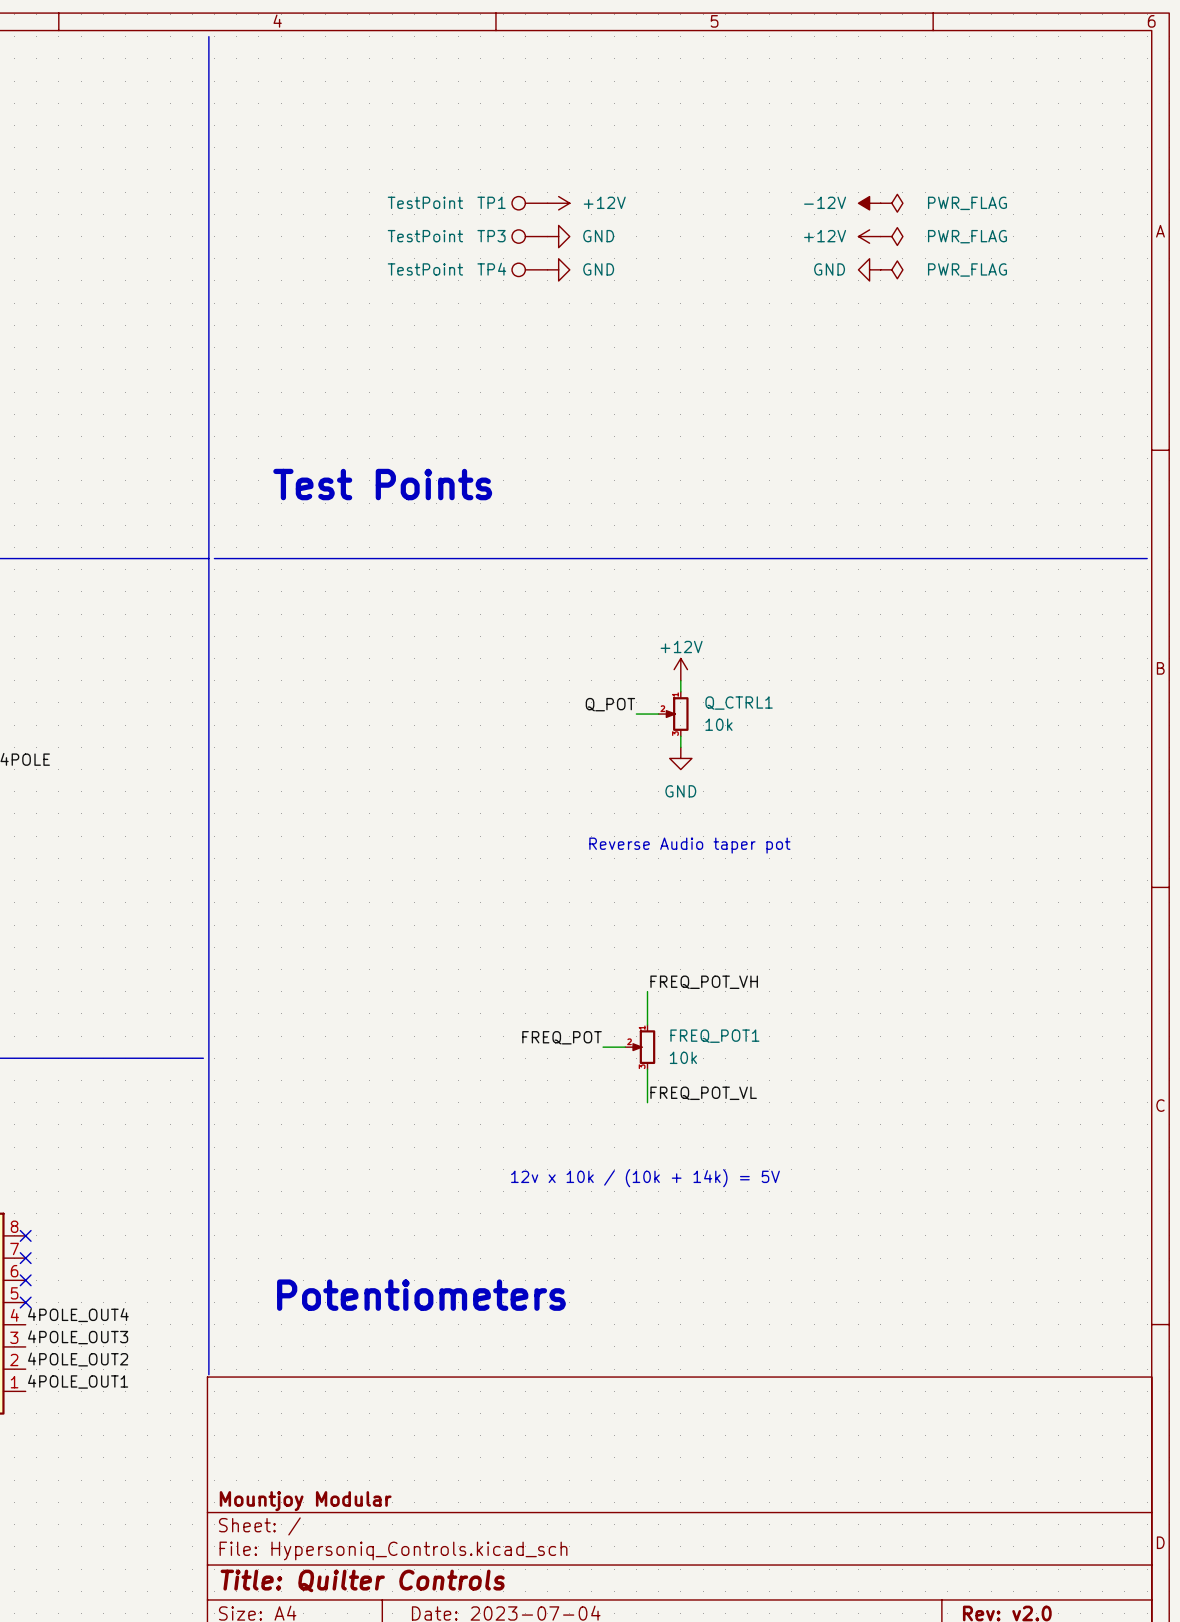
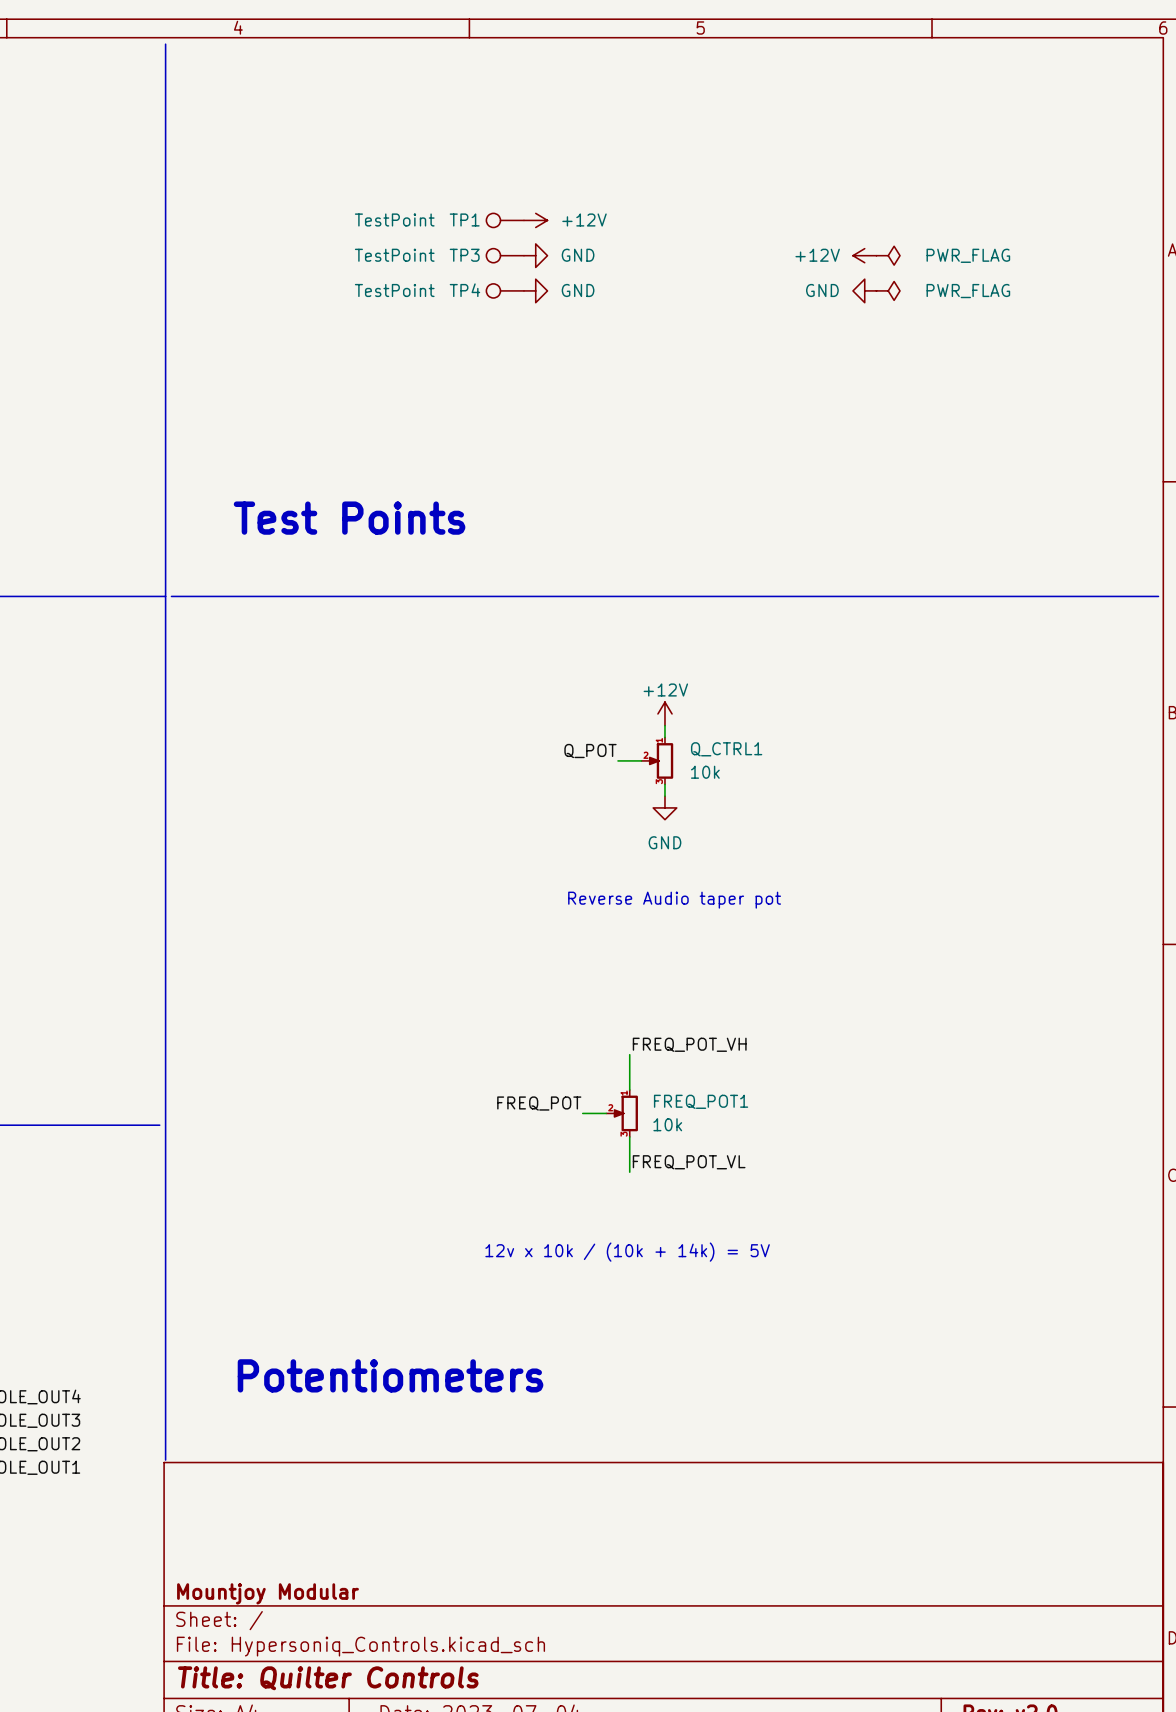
power symbol: -12V (869, 203) -> none
power symbol: PWR_FLAG (891, 203) -> none

